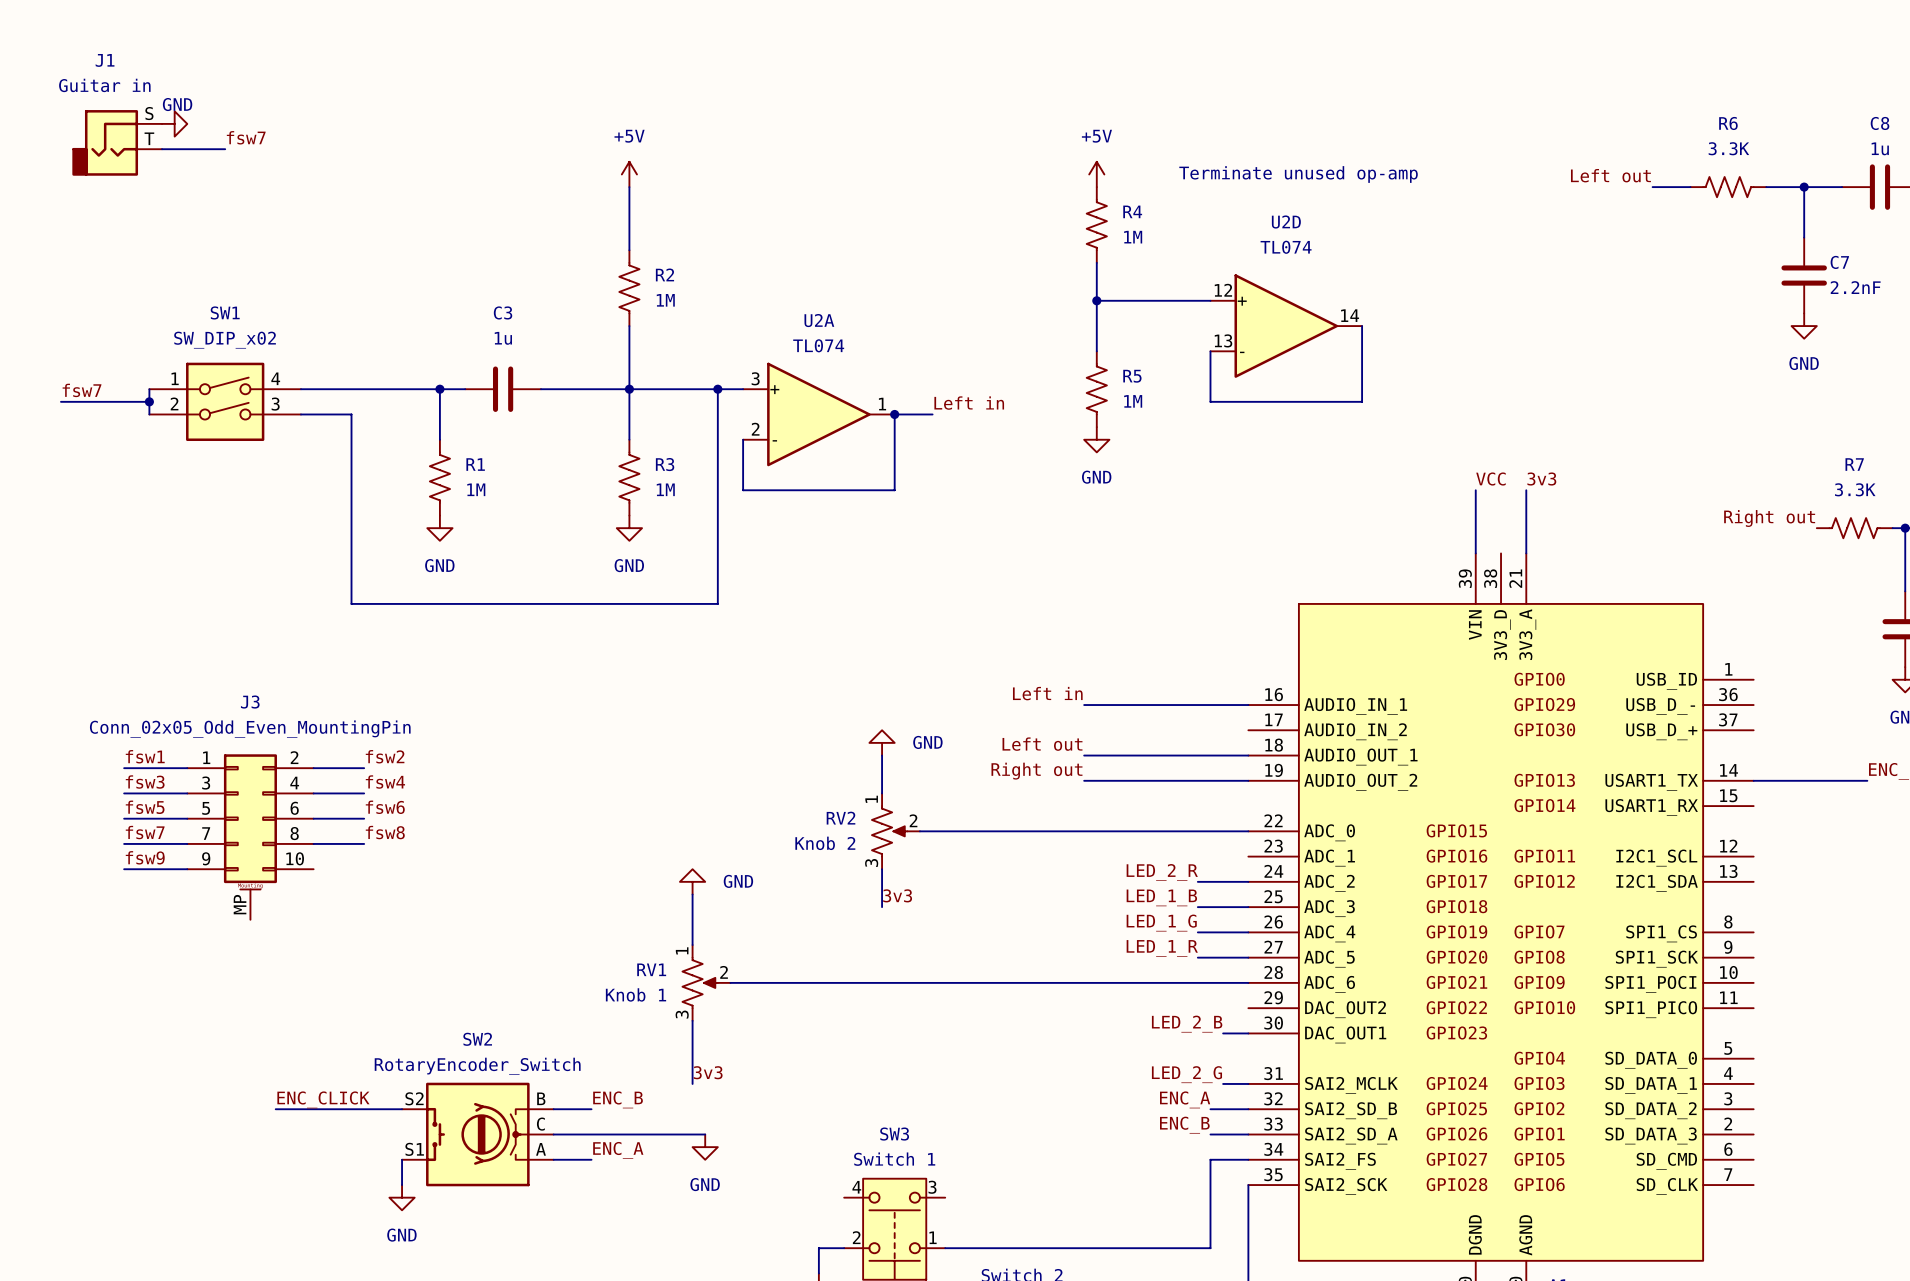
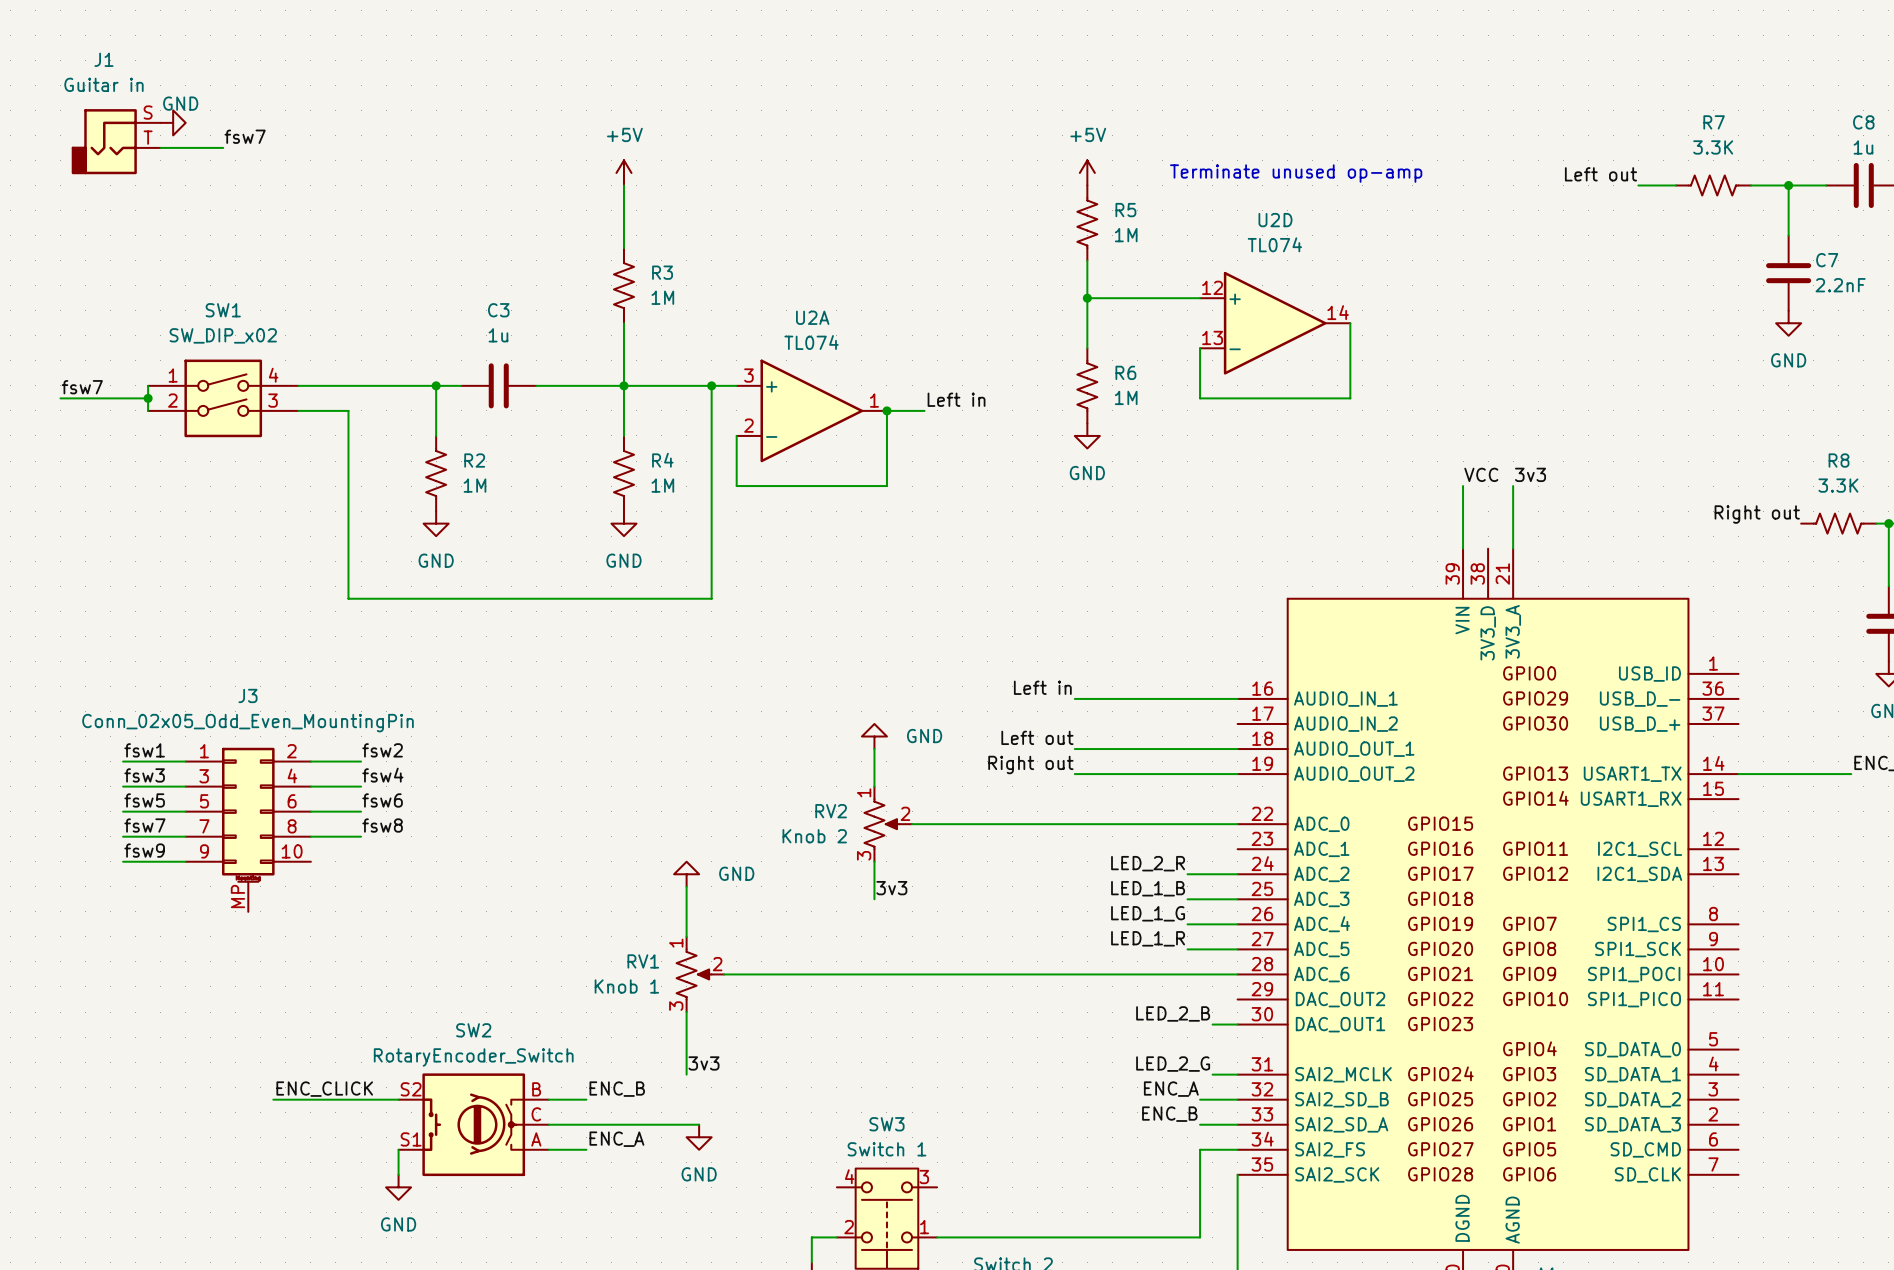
R6 name: R6 (1728, 123) -> R7 (1714, 122)
R4 name: R4 (1132, 211) -> R5 (1125, 210)
R2 name: R2 (664, 274) -> R3 (662, 272)
R5 name: R5 (1132, 376) -> R6 (1125, 372)
R1 name: R1 (475, 464) -> R2 (474, 460)
R3 name: R3 (665, 464) -> R4 (662, 460)
R7 name: R7 (1854, 464) -> R8 (1839, 460)

